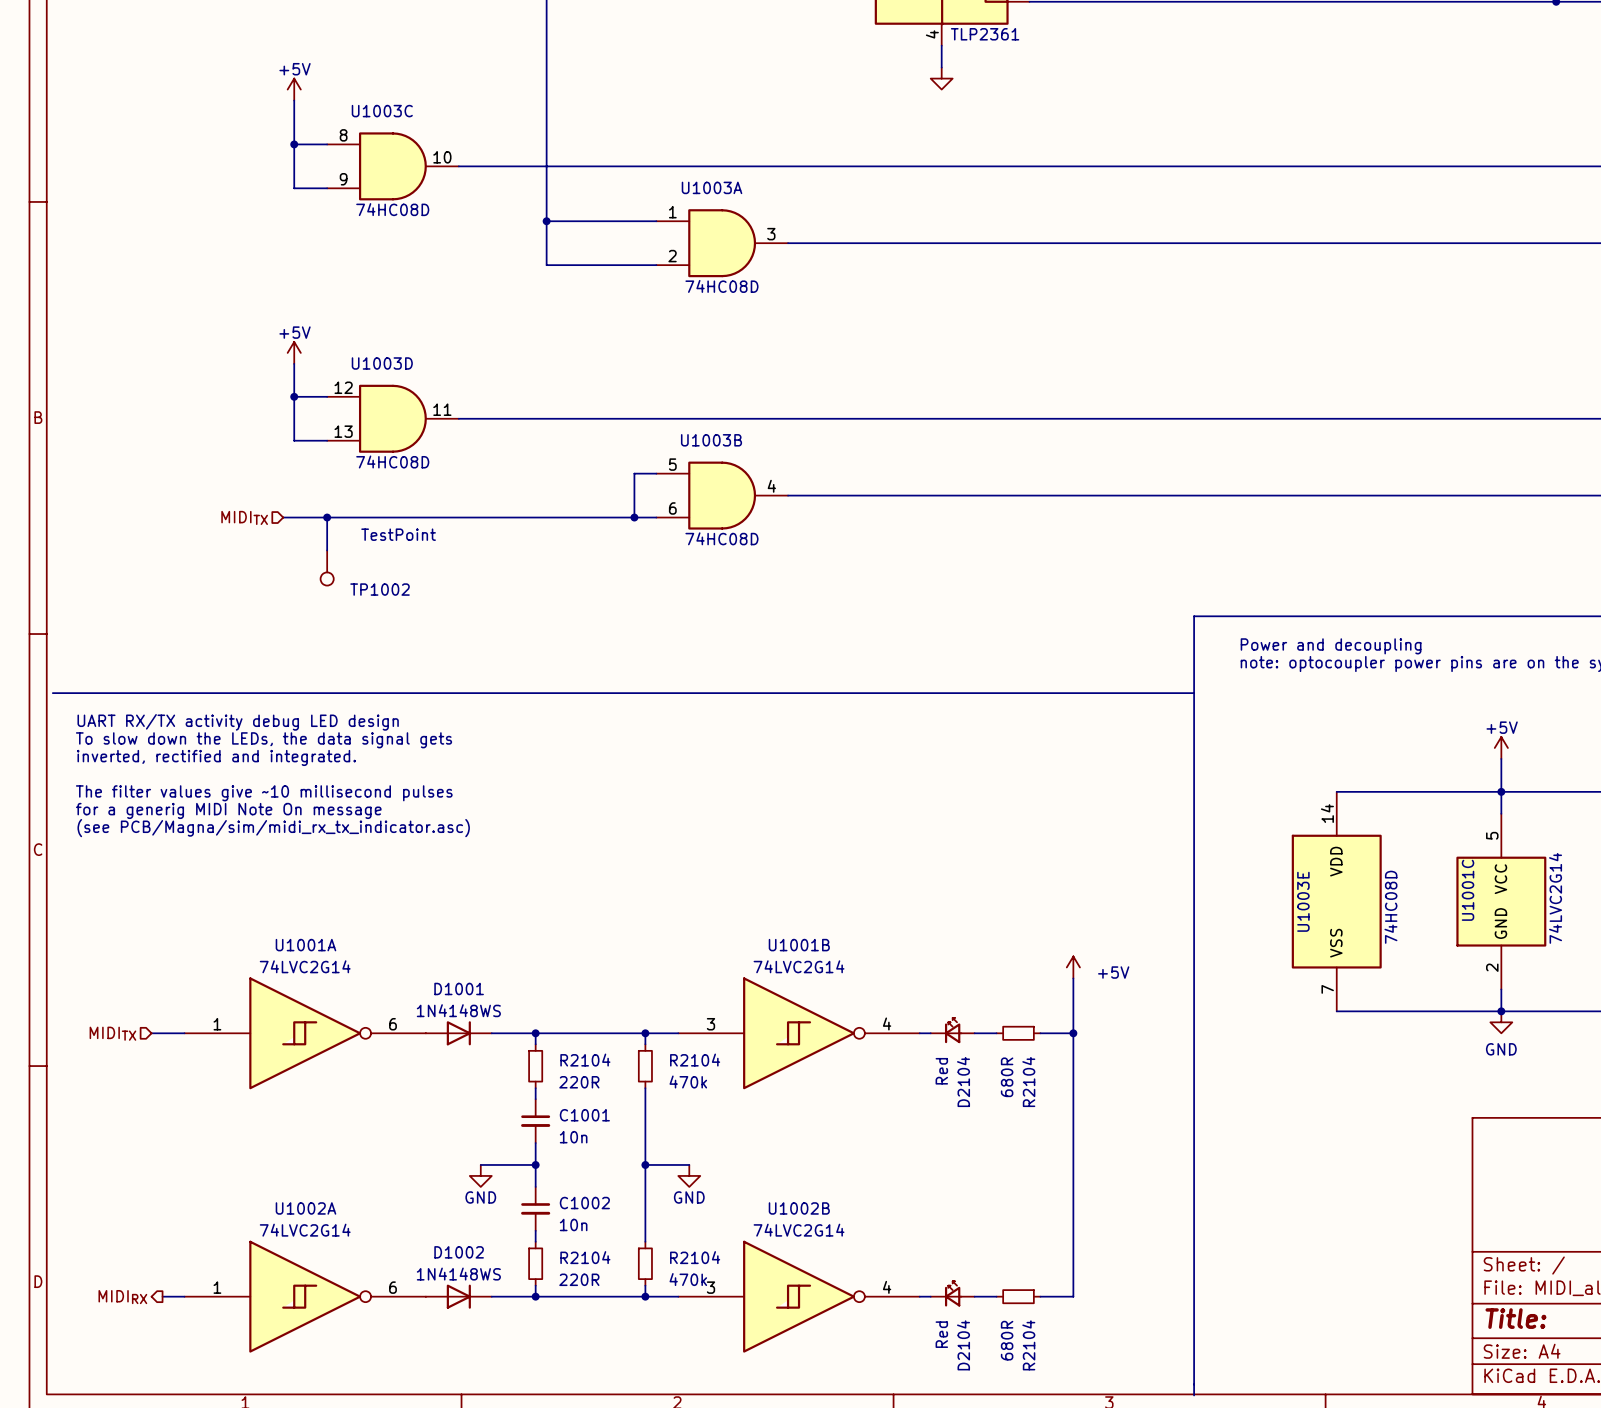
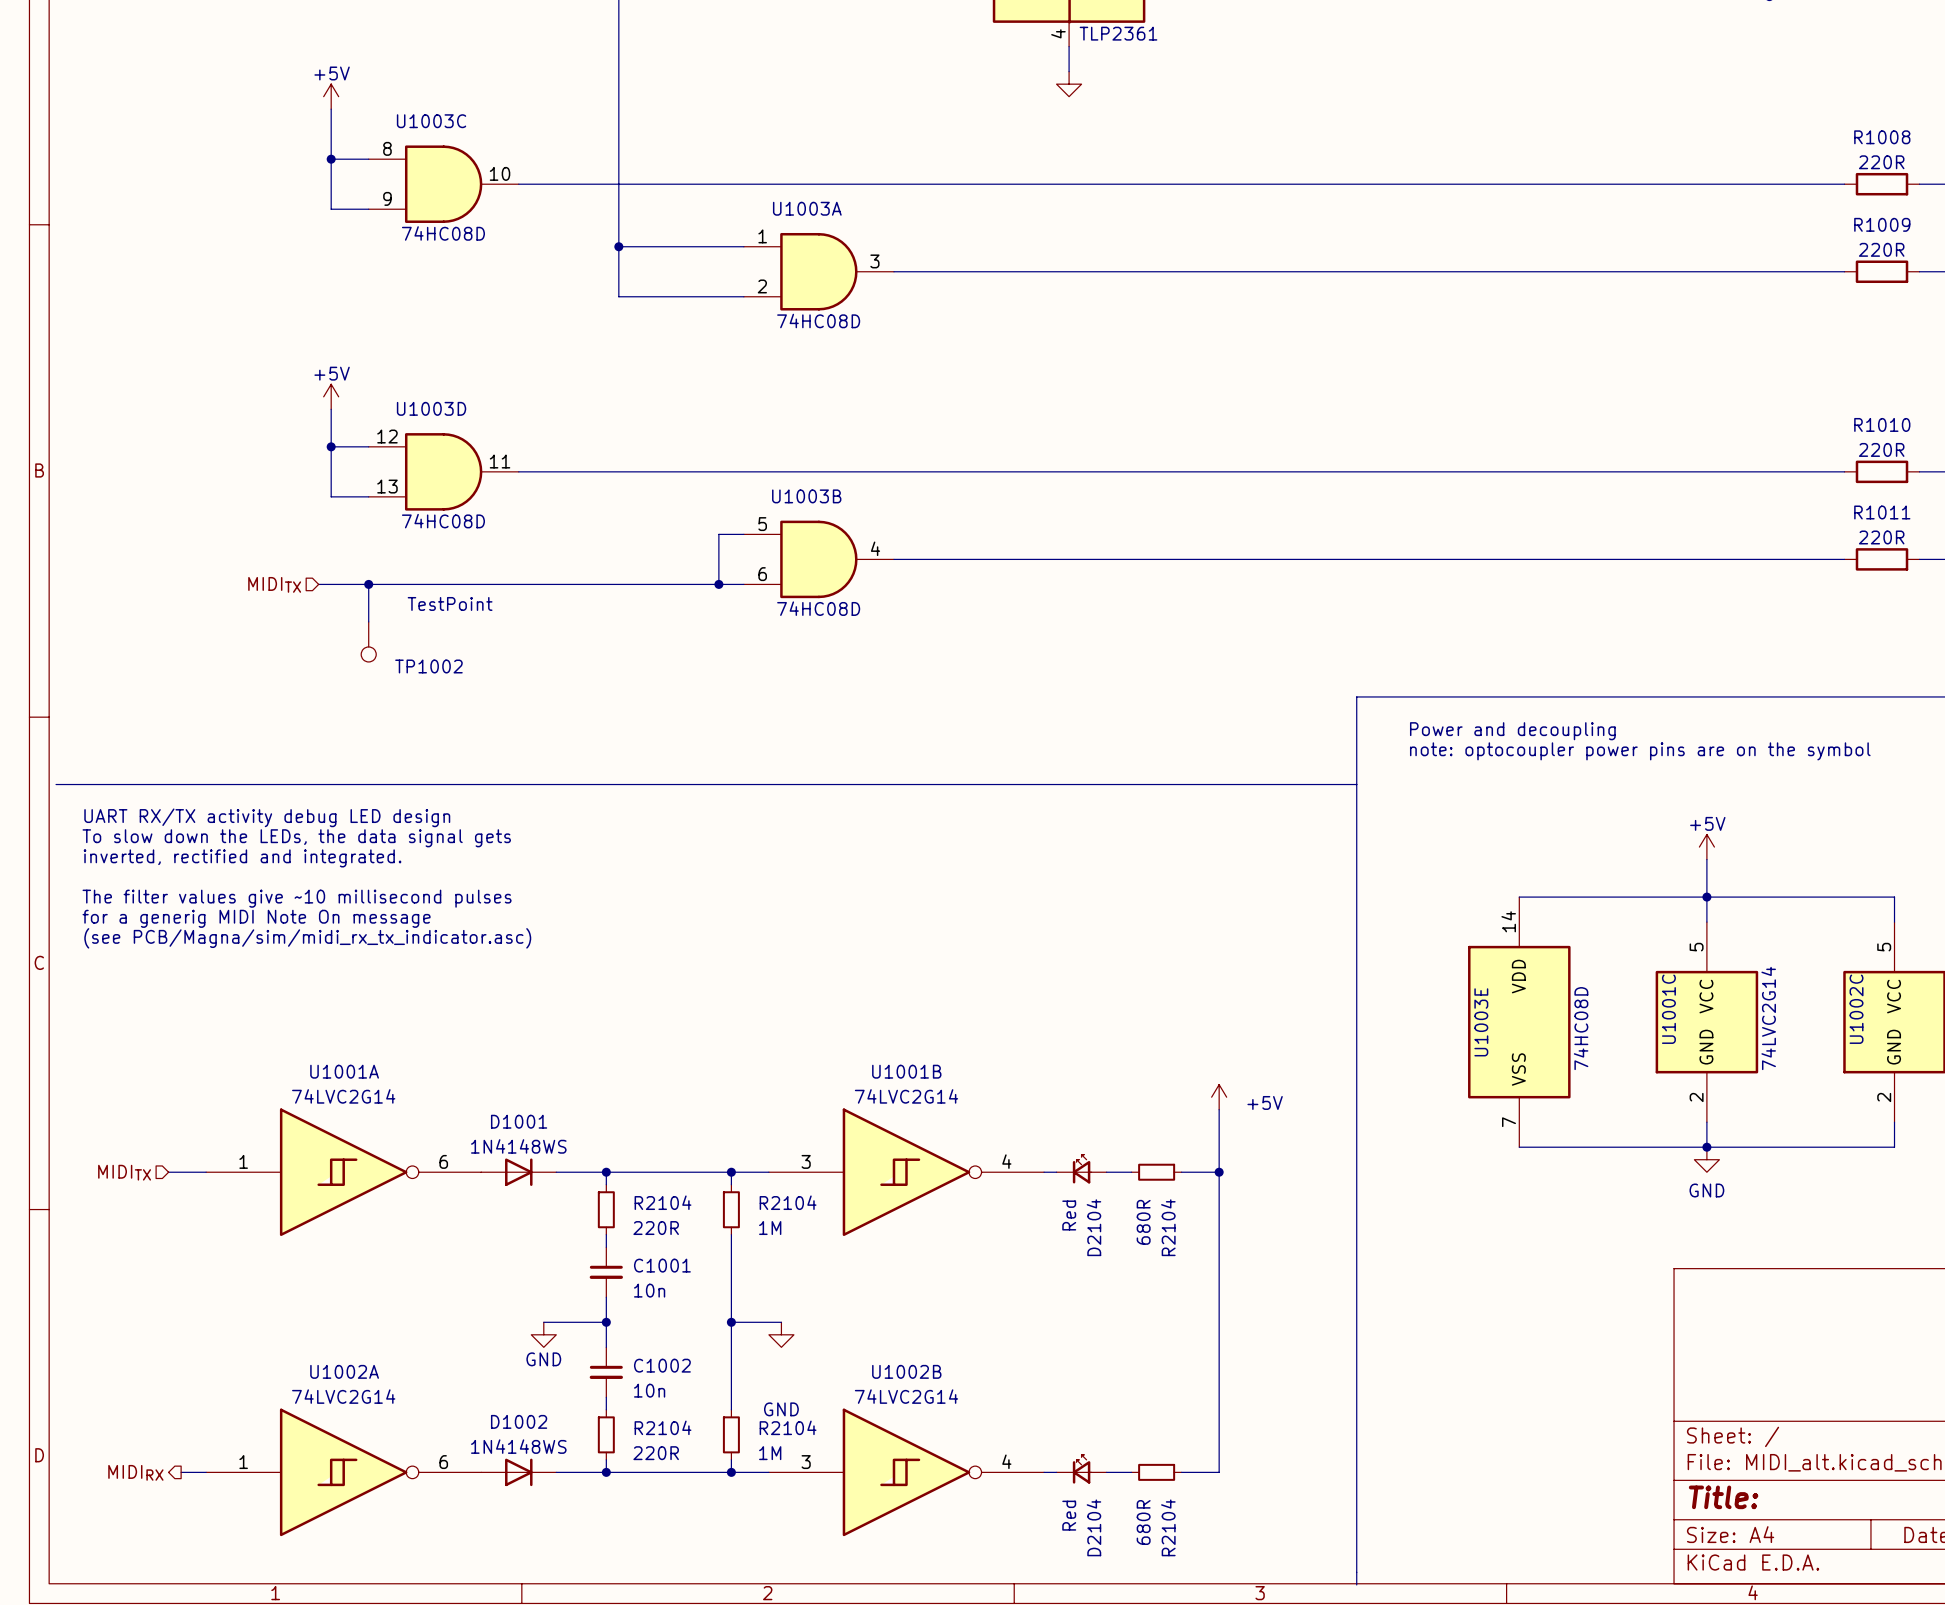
R2104 value: 470k (688, 1082) -> 1M (770, 1228)
power symbol text position: GND (689, 1197) -> GND (781, 1409)
R2104 value: 470k (688, 1279) -> 1M (770, 1453)

